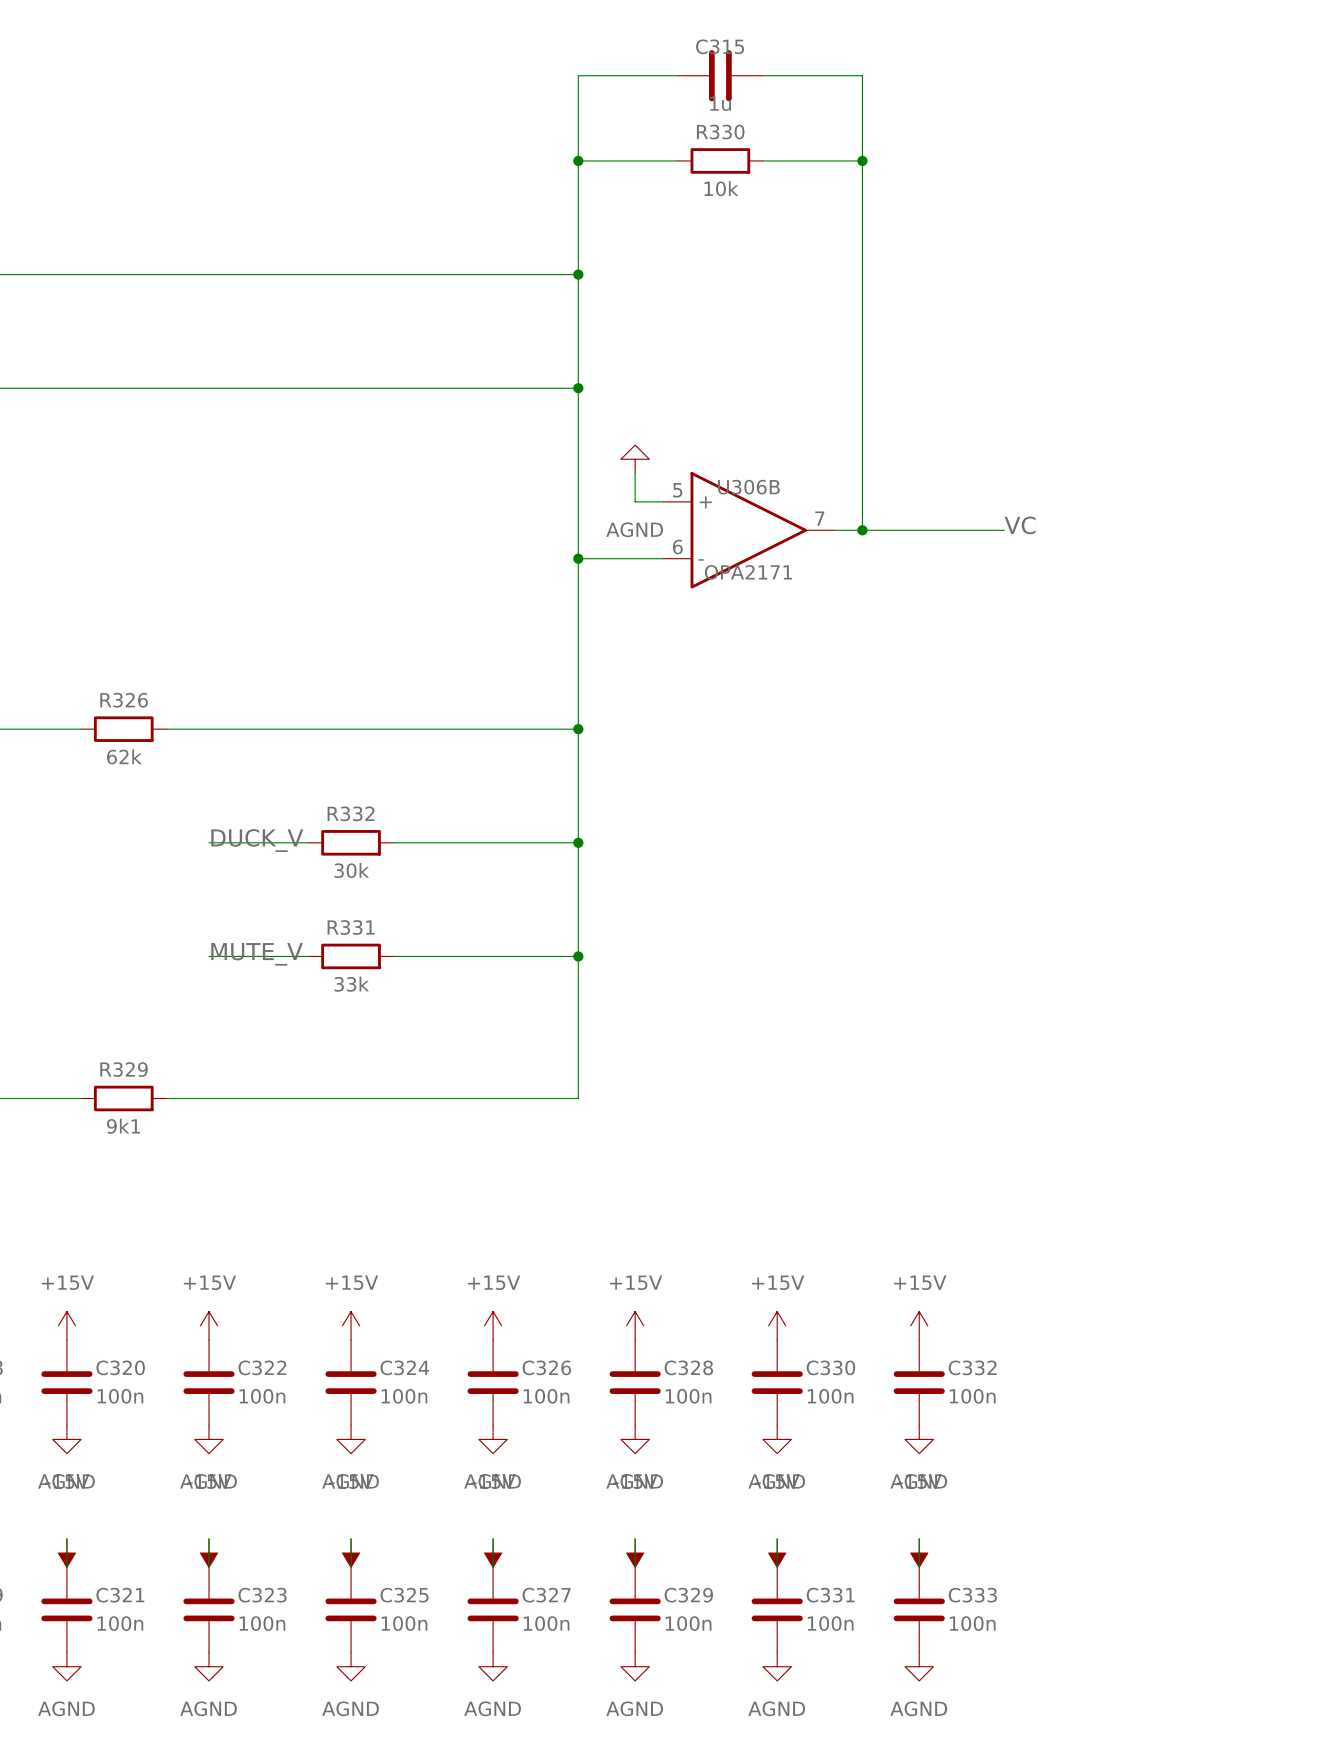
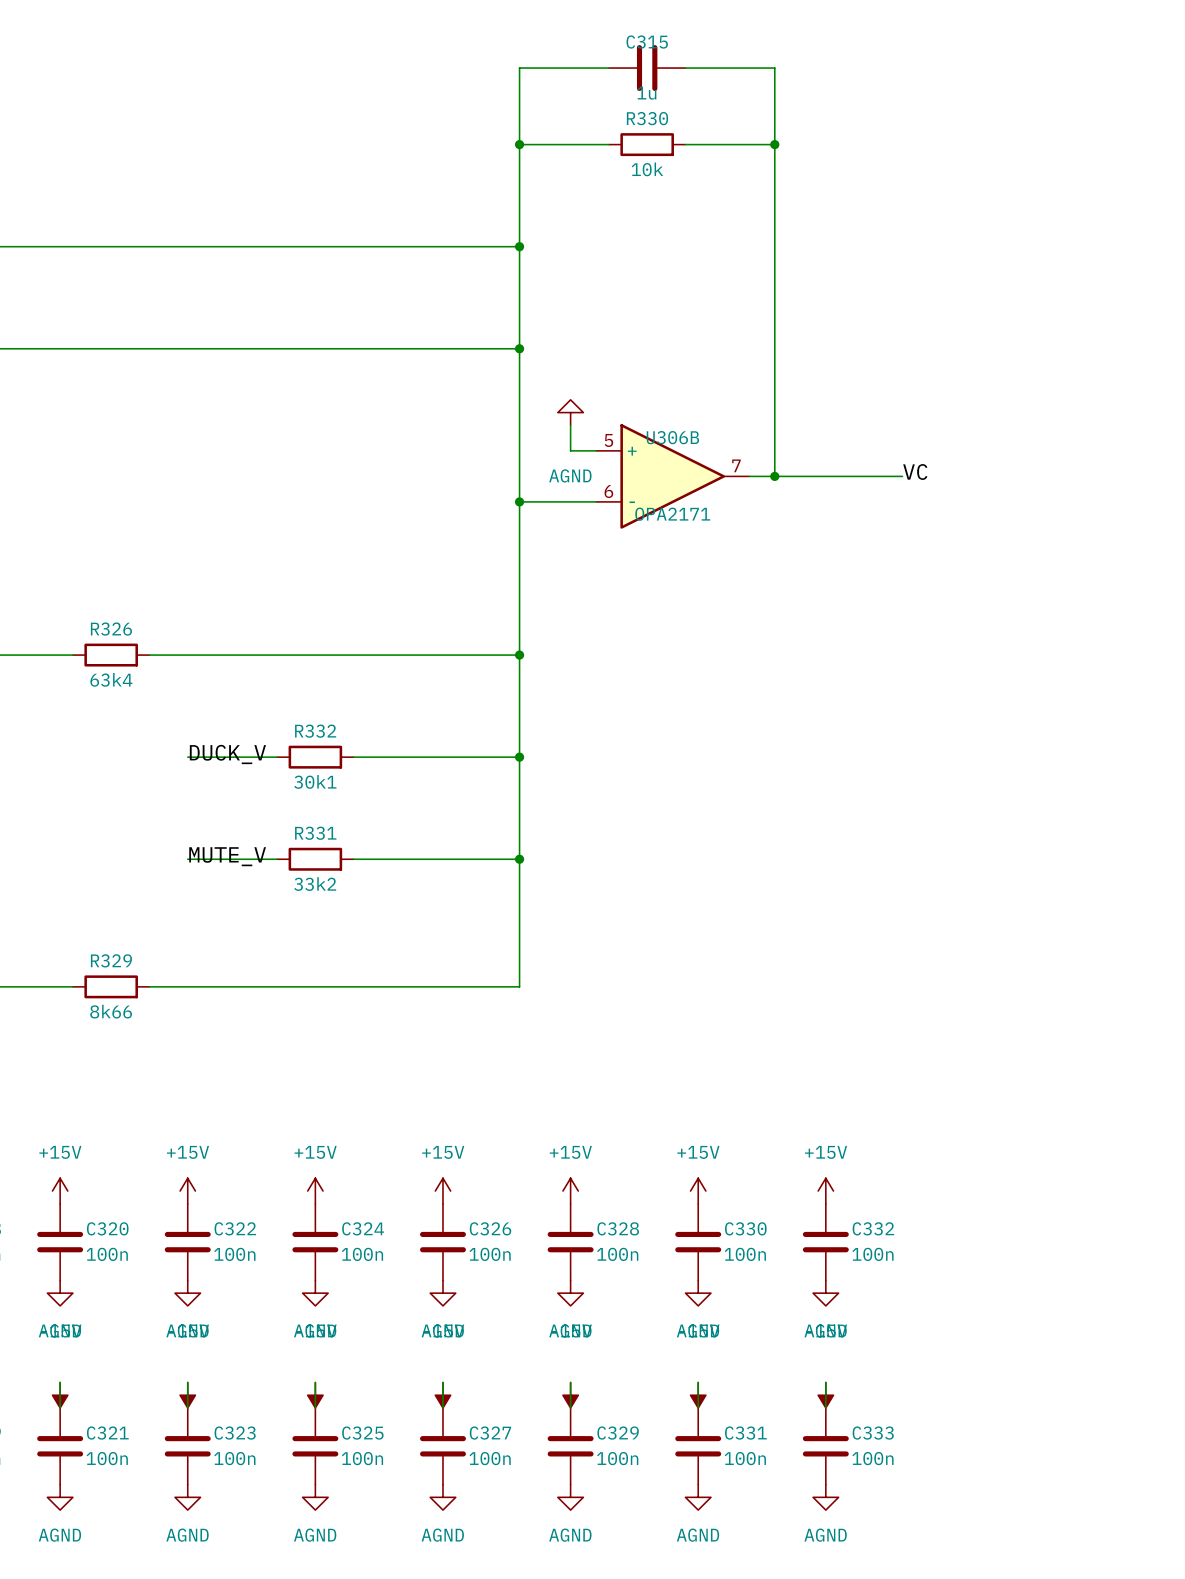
R326 value: 62k (124, 756) -> 63k4 (111, 679)
R332 value: 30k (351, 870) -> 30k1 (315, 781)
R331 value: 33k (351, 984) -> 33k2 (315, 884)
R329 value: 9k1 (123, 1126) -> 8k66 (111, 1011)

